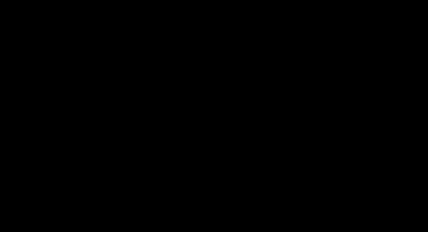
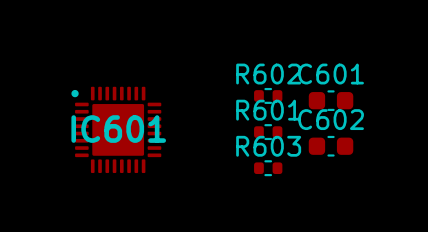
R602: none -> (268, 95)
C601: none -> (331, 100)
IC601: none -> (116, 129)
R601: none -> (268, 132)
C602: none -> (331, 146)
R603: none -> (268, 168)

